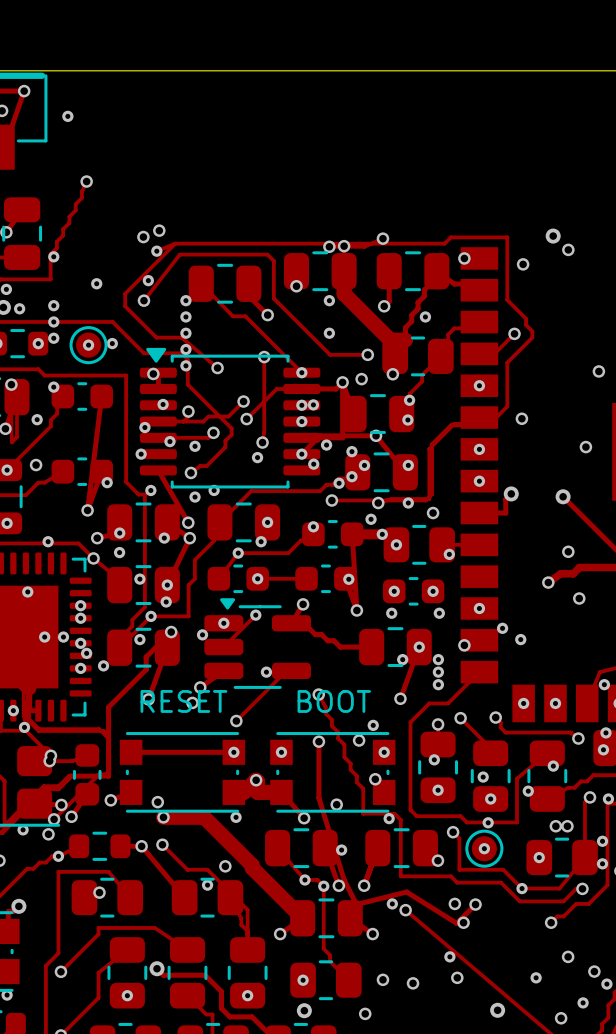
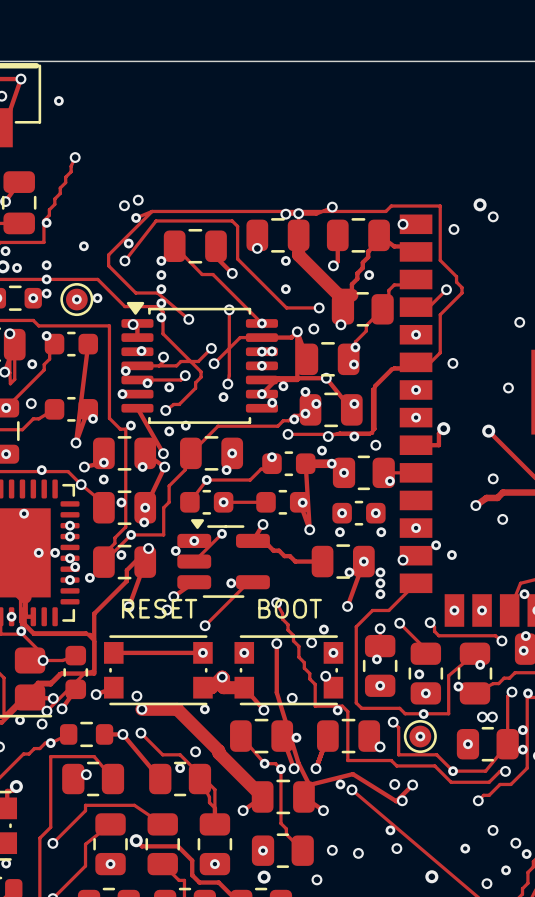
via: (50, 755) -> none

